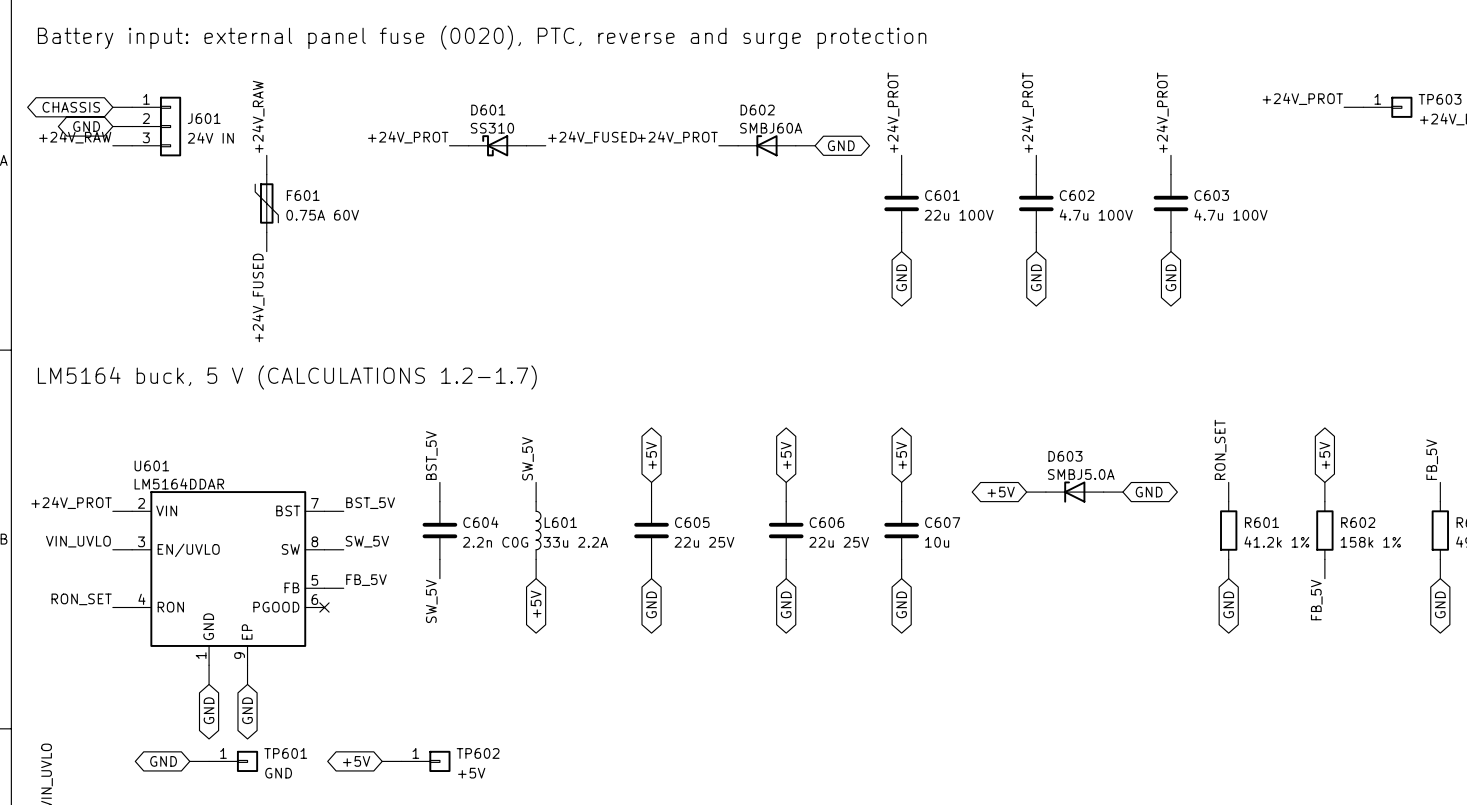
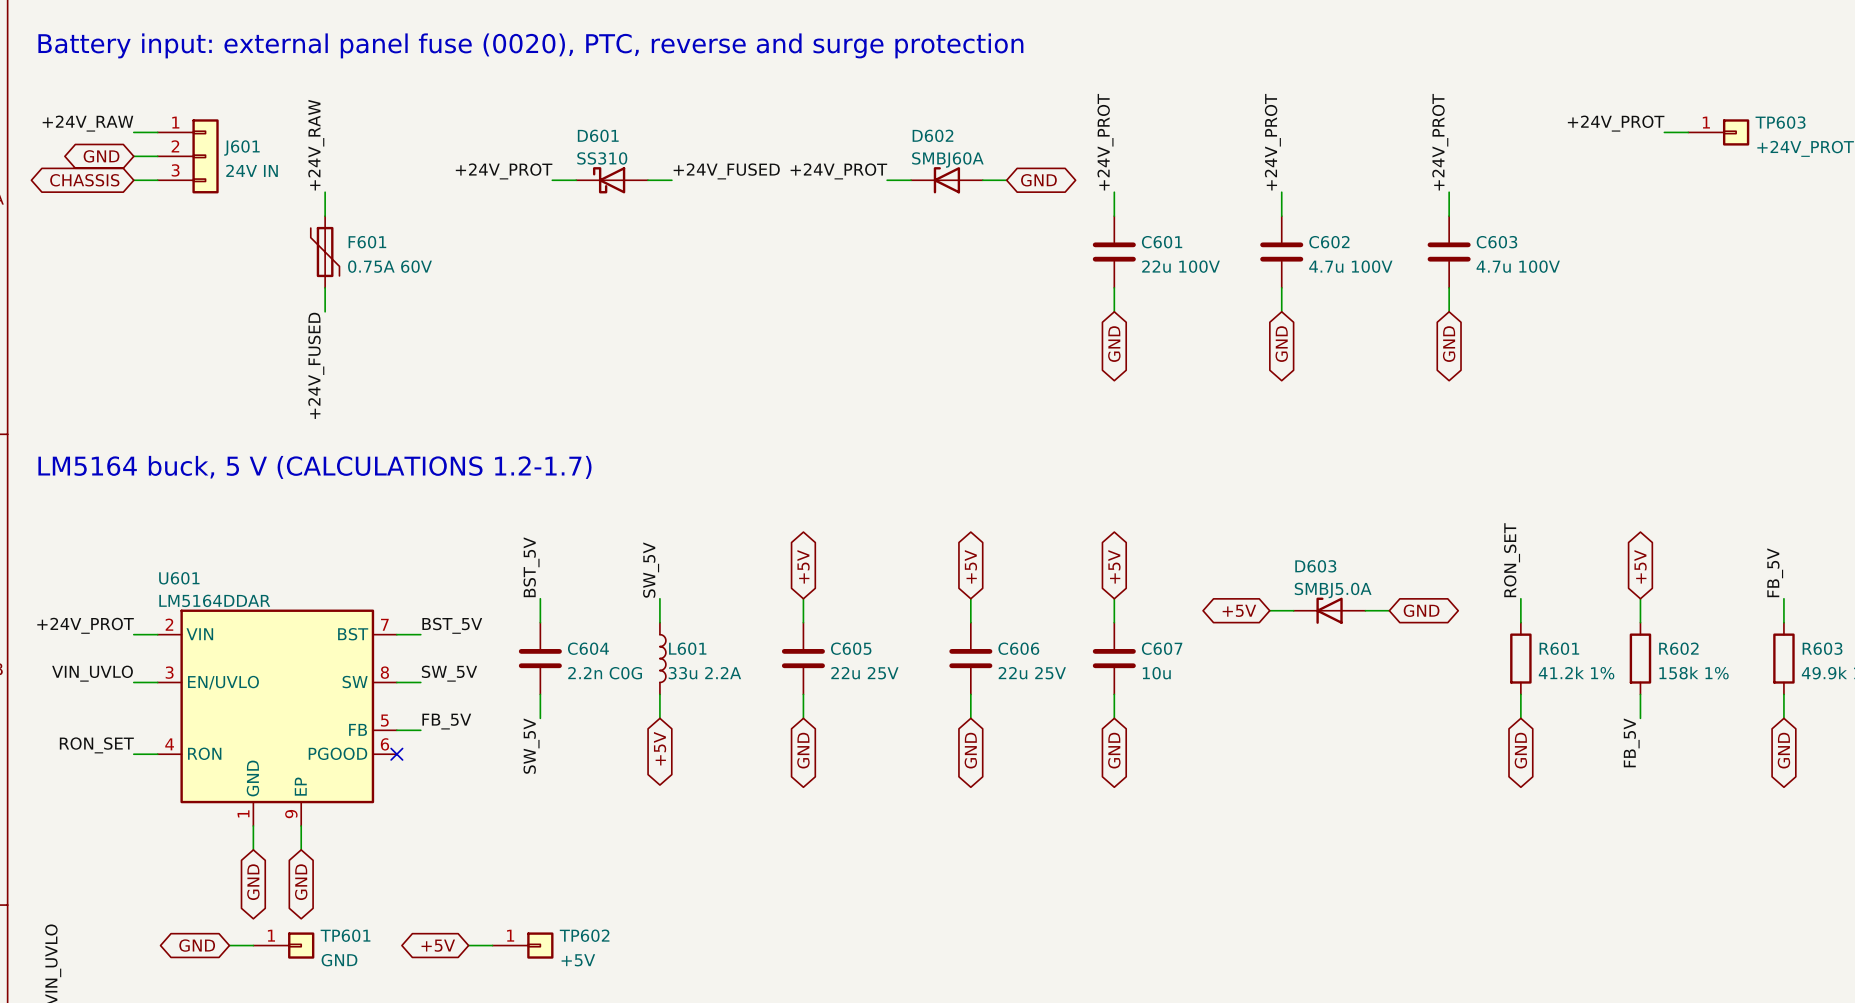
global label position: CHASSIS (71, 107) -> CHASSIS (84, 180)
label position: +24V_RAW (75, 137) -> +24V_RAW (87, 123)

